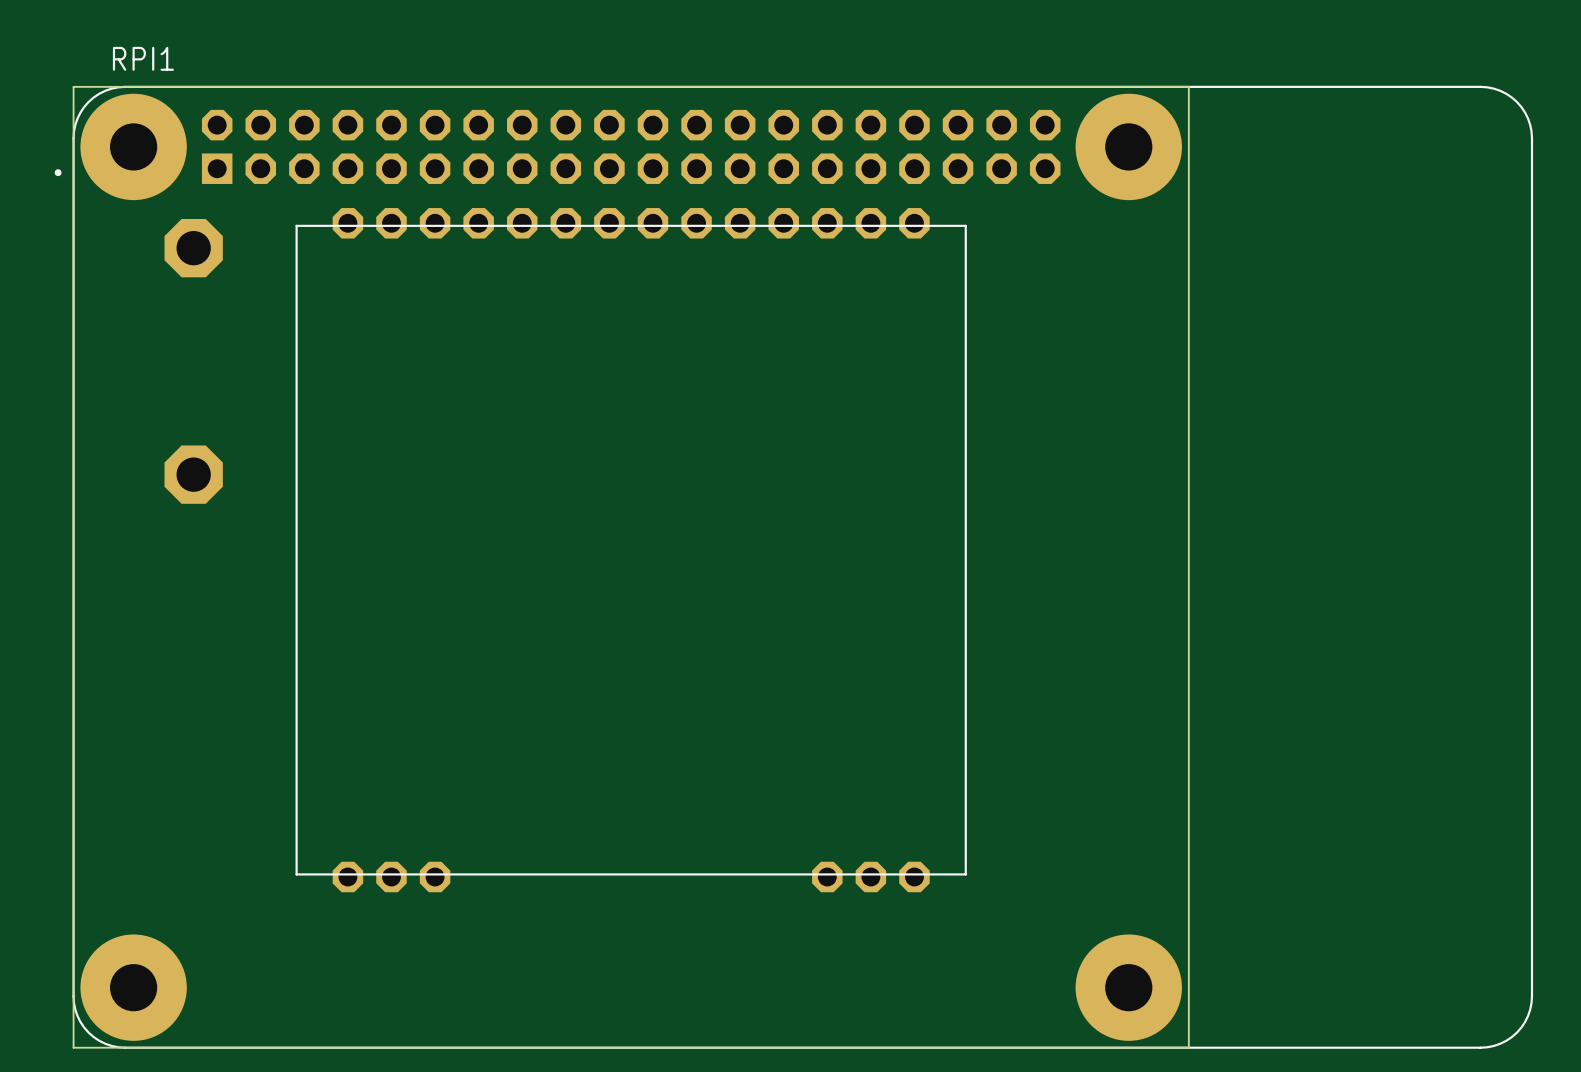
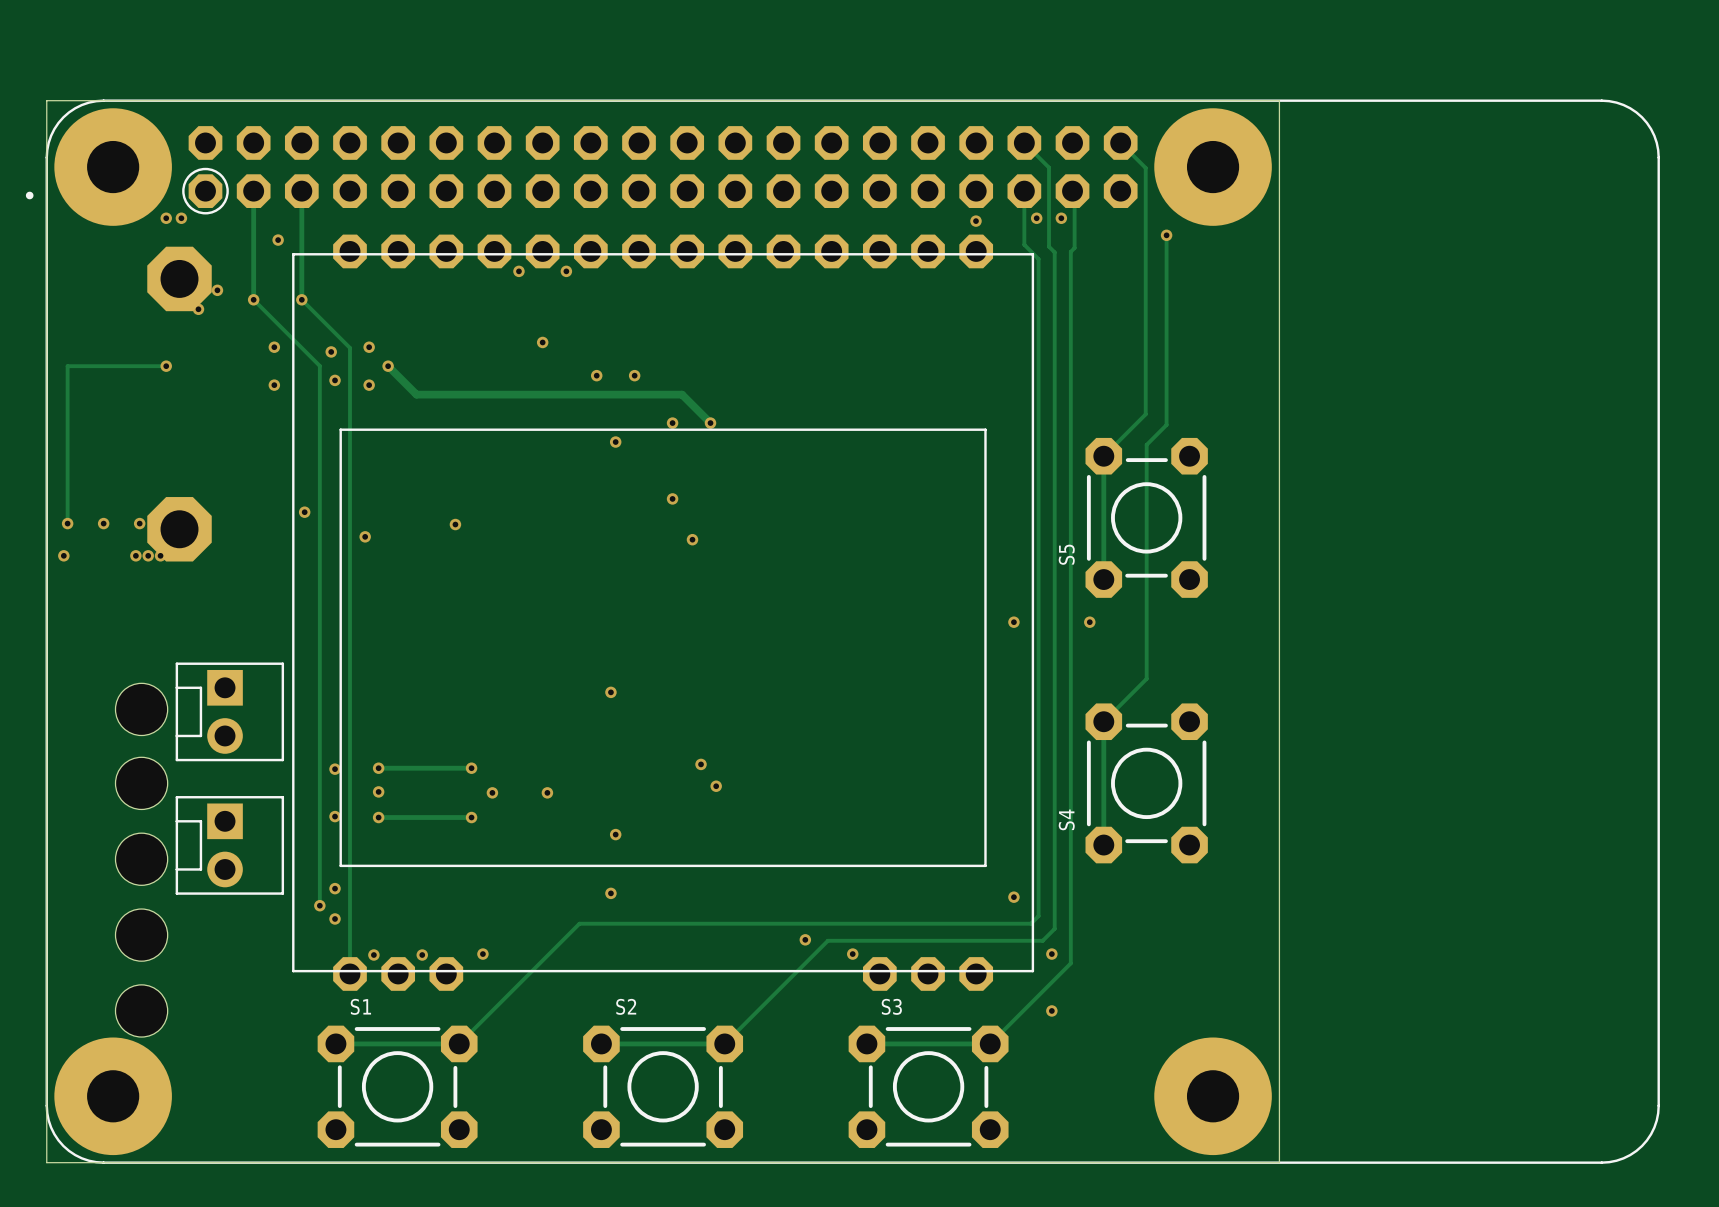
track: none -> (1024, 142) (1049, 167) (1049, 246) (1054, 252) (1054, 928) (1042, 940) (827, 940) (724, 1043) (601, 1043)
track: none -> (1120, 142) (1145, 168) (1145, 414) (1103, 456) (1103, 579)
track: none -> (253, 191) (253, 299) (319, 365) (319, 905)
track: none -> (301, 191) (301, 299) (350, 347) (350, 973)
track: none -> (1024, 191) (1024, 244) (1038, 259) (1038, 916) (1030, 923) (579, 923) (459, 1043) (335, 1043)
track: none -> (1072, 191) (1074, 192) (1074, 248) (1070, 251) (1070, 963) (990, 1043) (866, 1043)
via: none -> (166, 218)
via: none -> (181, 218)
via: none -> (1036, 218)
via: none -> (1061, 218)
via: none -> (976, 221)
part footprint: [295, 208, 967, 893] -> [292, 234, 1035, 991]
track: none -> (1166, 235) (1166, 424) (1146, 444) (1146, 678) (1103, 721) (1103, 845)
via: none -> (1166, 235)
via: none -> (278, 240)
via: none -> (518, 271)
via: none -> (566, 271)
via: none -> (217, 290)
via: none -> (253, 299)
via: none -> (301, 299)
via: none -> (198, 309)
via: none -> (542, 342)
via: none -> (274, 347)
via: none -> (369, 347)
via: none -> (331, 351)
track: none -> (166, 366) (67, 366) (67, 523)
via: none -> (166, 366)
track: none -> (388, 366) (416, 394) (682, 394) (710, 423)
via: none -> (388, 366)
via: none -> (596, 375)
via: none -> (634, 375)
via: none -> (335, 380)
via: none -> (274, 385)
via: none -> (369, 385)
via: none -> (672, 423)
via: none -> (710, 423)
via: none -> (615, 442)
via: none -> (672, 498)
via: none -> (304, 512)
S5: none -> (1146, 517)
via: none -> (67, 523)
via: none -> (103, 523)
via: none -> (139, 523)
via: none -> (455, 524)
via: none -> (365, 536)
via: none -> (692, 539)
via: none -> (63, 555)
via: none -> (135, 555)
via: none -> (148, 555)
via: none -> (160, 555)
via: none -> (1013, 622)
via: none -> (1089, 622)
RPI1: (793, 567) -> none
part: none -> (842, 631)
via: none -> (610, 692)
hole: none -> (141, 709)
part: none -> (229, 711)
via: none -> (701, 764)
track: none -> (378, 768) (471, 768)
via: none -> (378, 768)
via: none -> (471, 768)
via: none -> (335, 769)
hole: none -> (141, 783)
S4: none -> (1146, 783)
via: none -> (716, 786)
via: none -> (378, 791)
via: none -> (492, 792)
via: none -> (547, 792)
via: none -> (335, 816)
track: none -> (378, 817) (471, 817)
via: none -> (378, 817)
via: none -> (471, 817)
via: none -> (615, 834)
part: none -> (229, 845)
hole: none -> (141, 859)
via: none -> (335, 888)
via: none -> (610, 893)
via: none -> (1013, 897)
via: none -> (319, 905)
via: none -> (335, 918)
hole: none -> (141, 935)
via: none -> (805, 939)
via: none -> (482, 954)
via: none -> (852, 954)
via: none -> (1051, 954)
via: none -> (373, 955)
via: none -> (422, 955)
hole: none -> (141, 1010)
via: none -> (1051, 1010)
S1: none -> (397, 1086)
S2: none -> (663, 1086)
S3: none -> (928, 1086)

